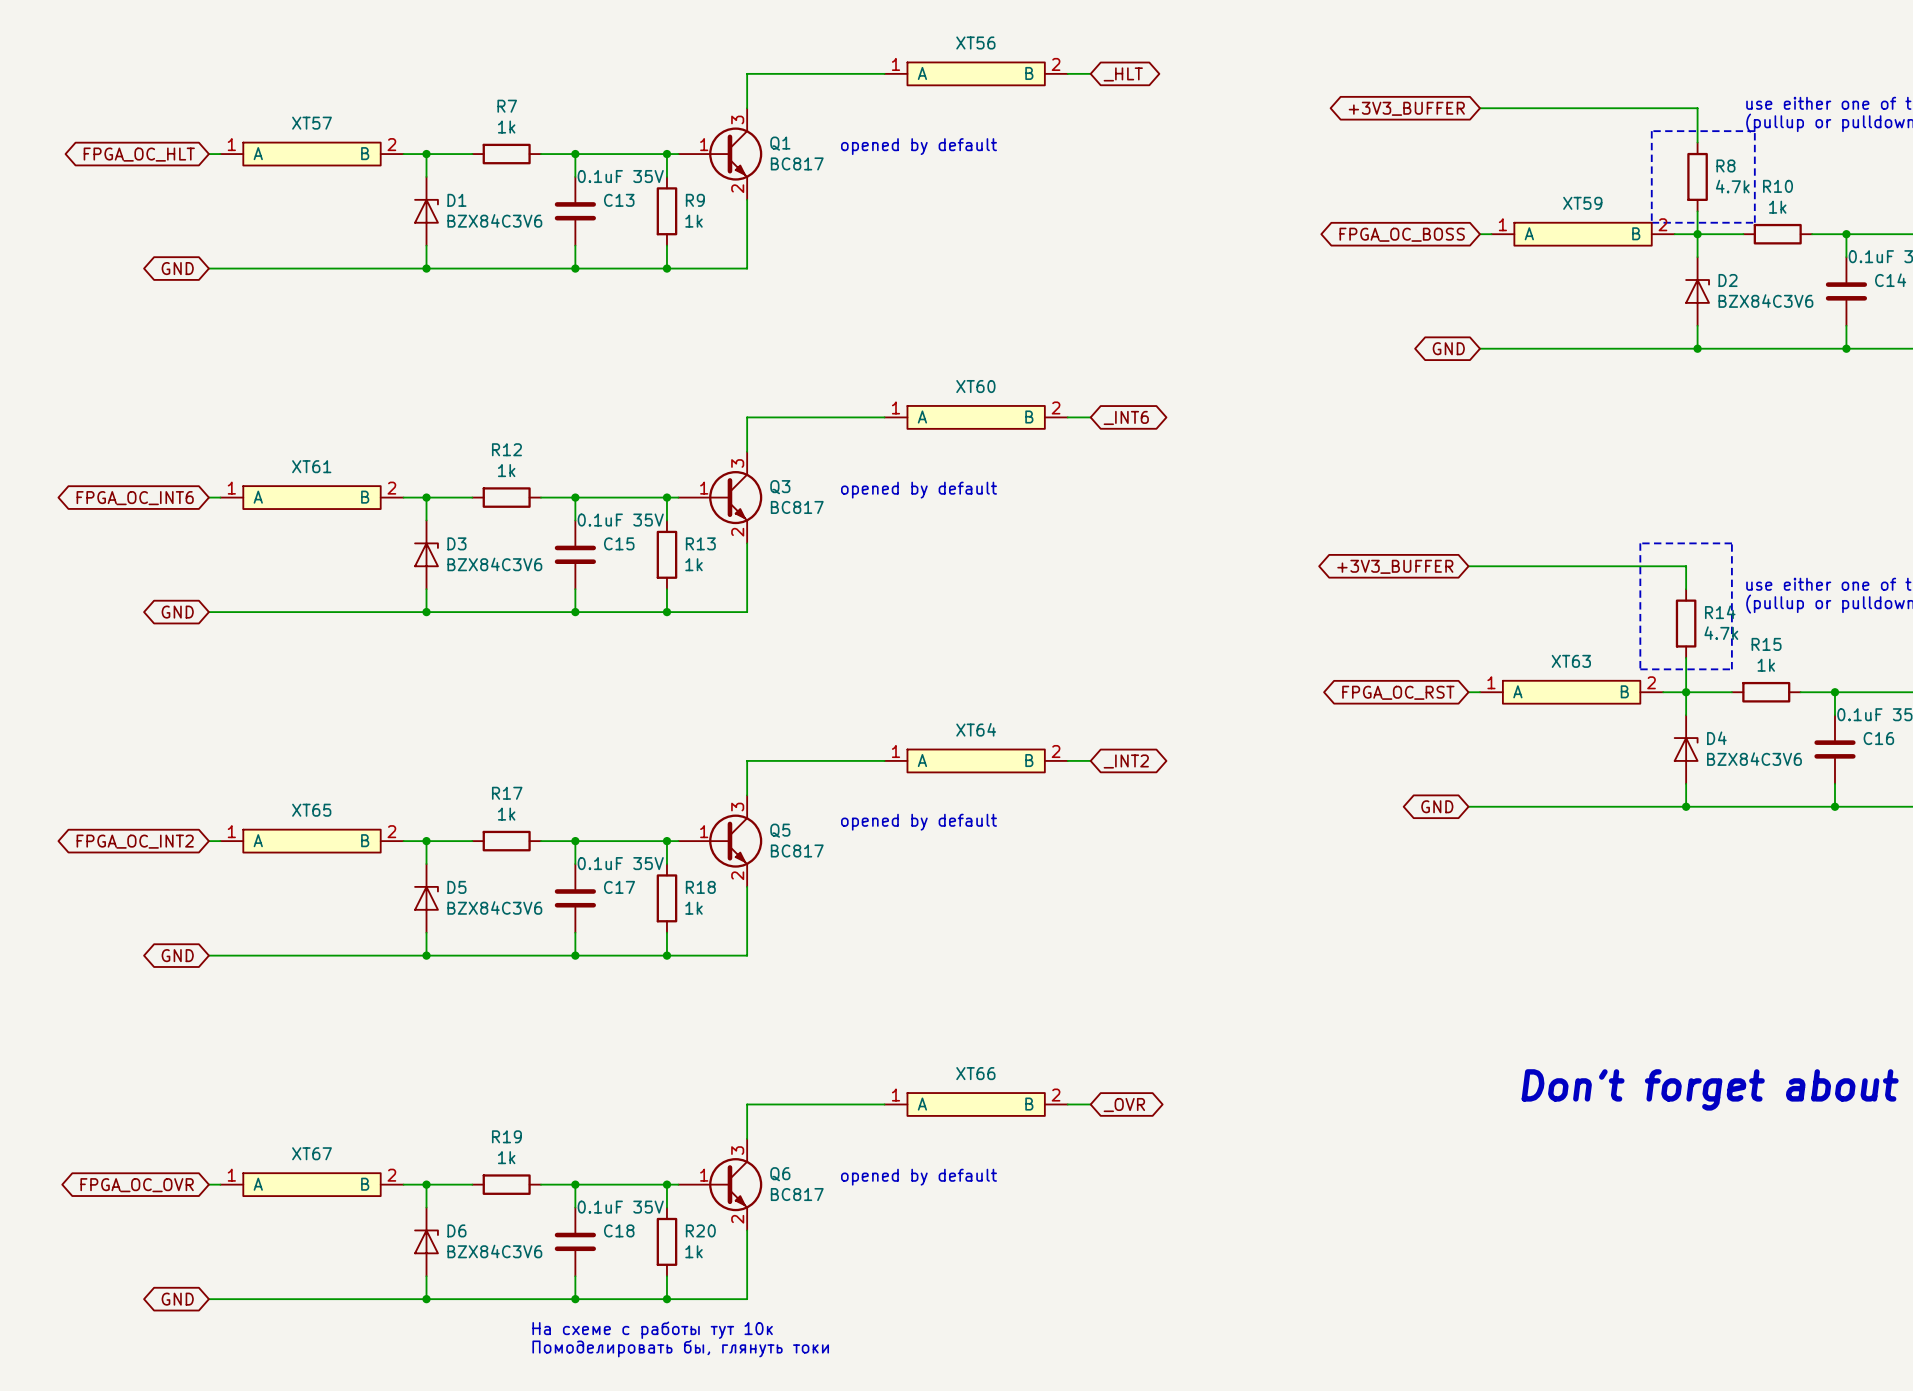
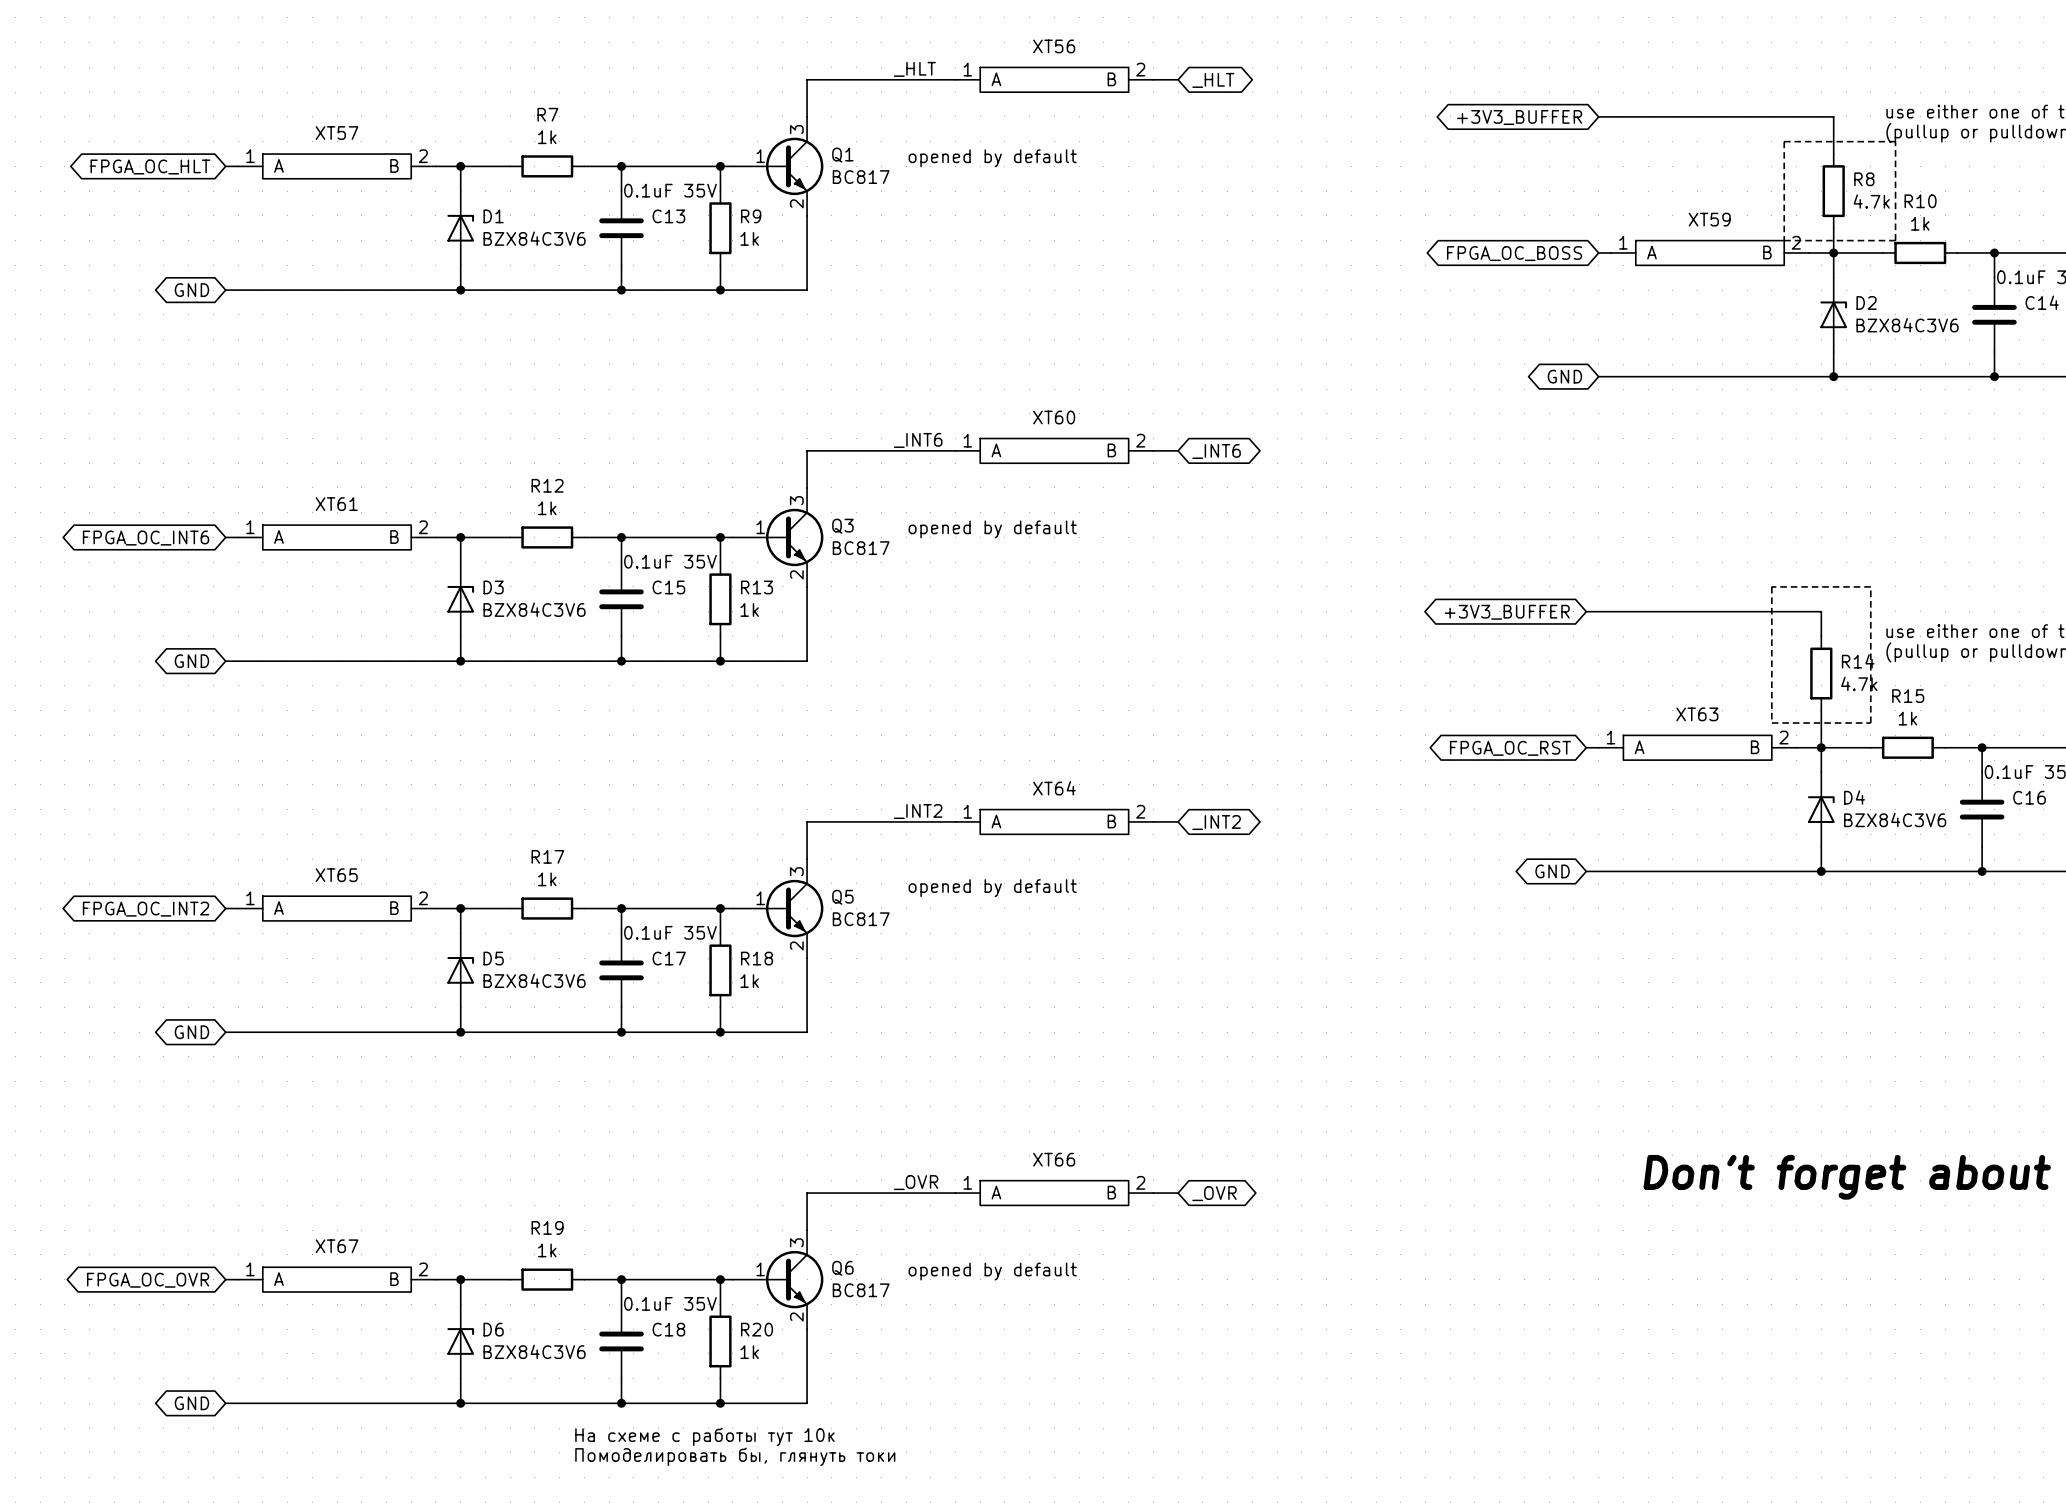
label: none -> _HLT (914, 69)
label: none -> _INT6 (918, 440)
label: none -> _INT2 (918, 811)
label: none -> _OVR (916, 1182)

